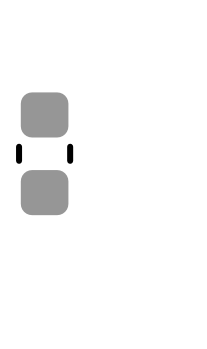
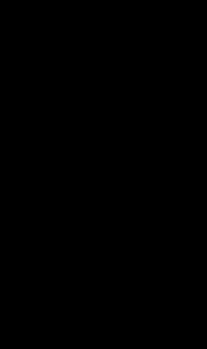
part: (44, 153) -> none

